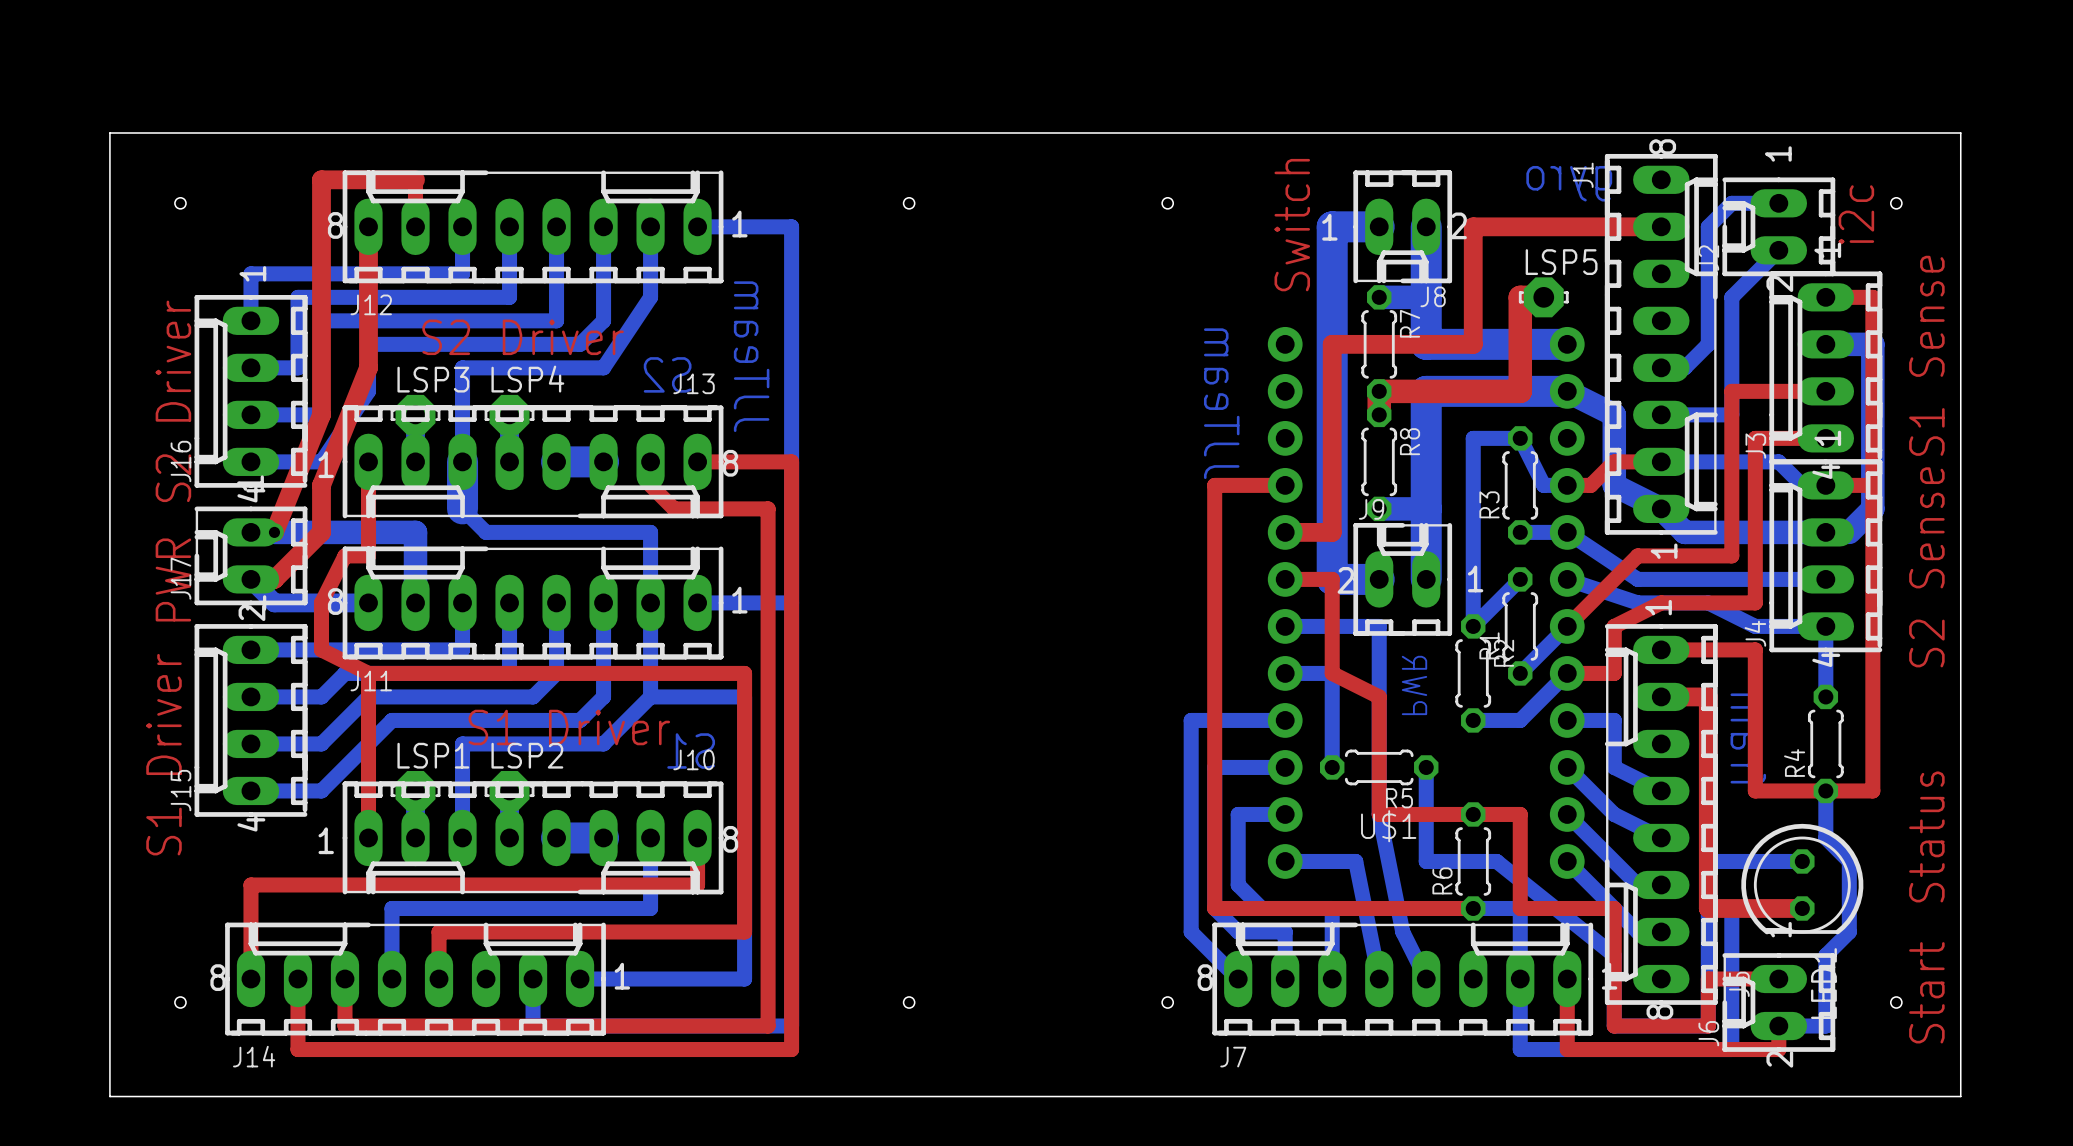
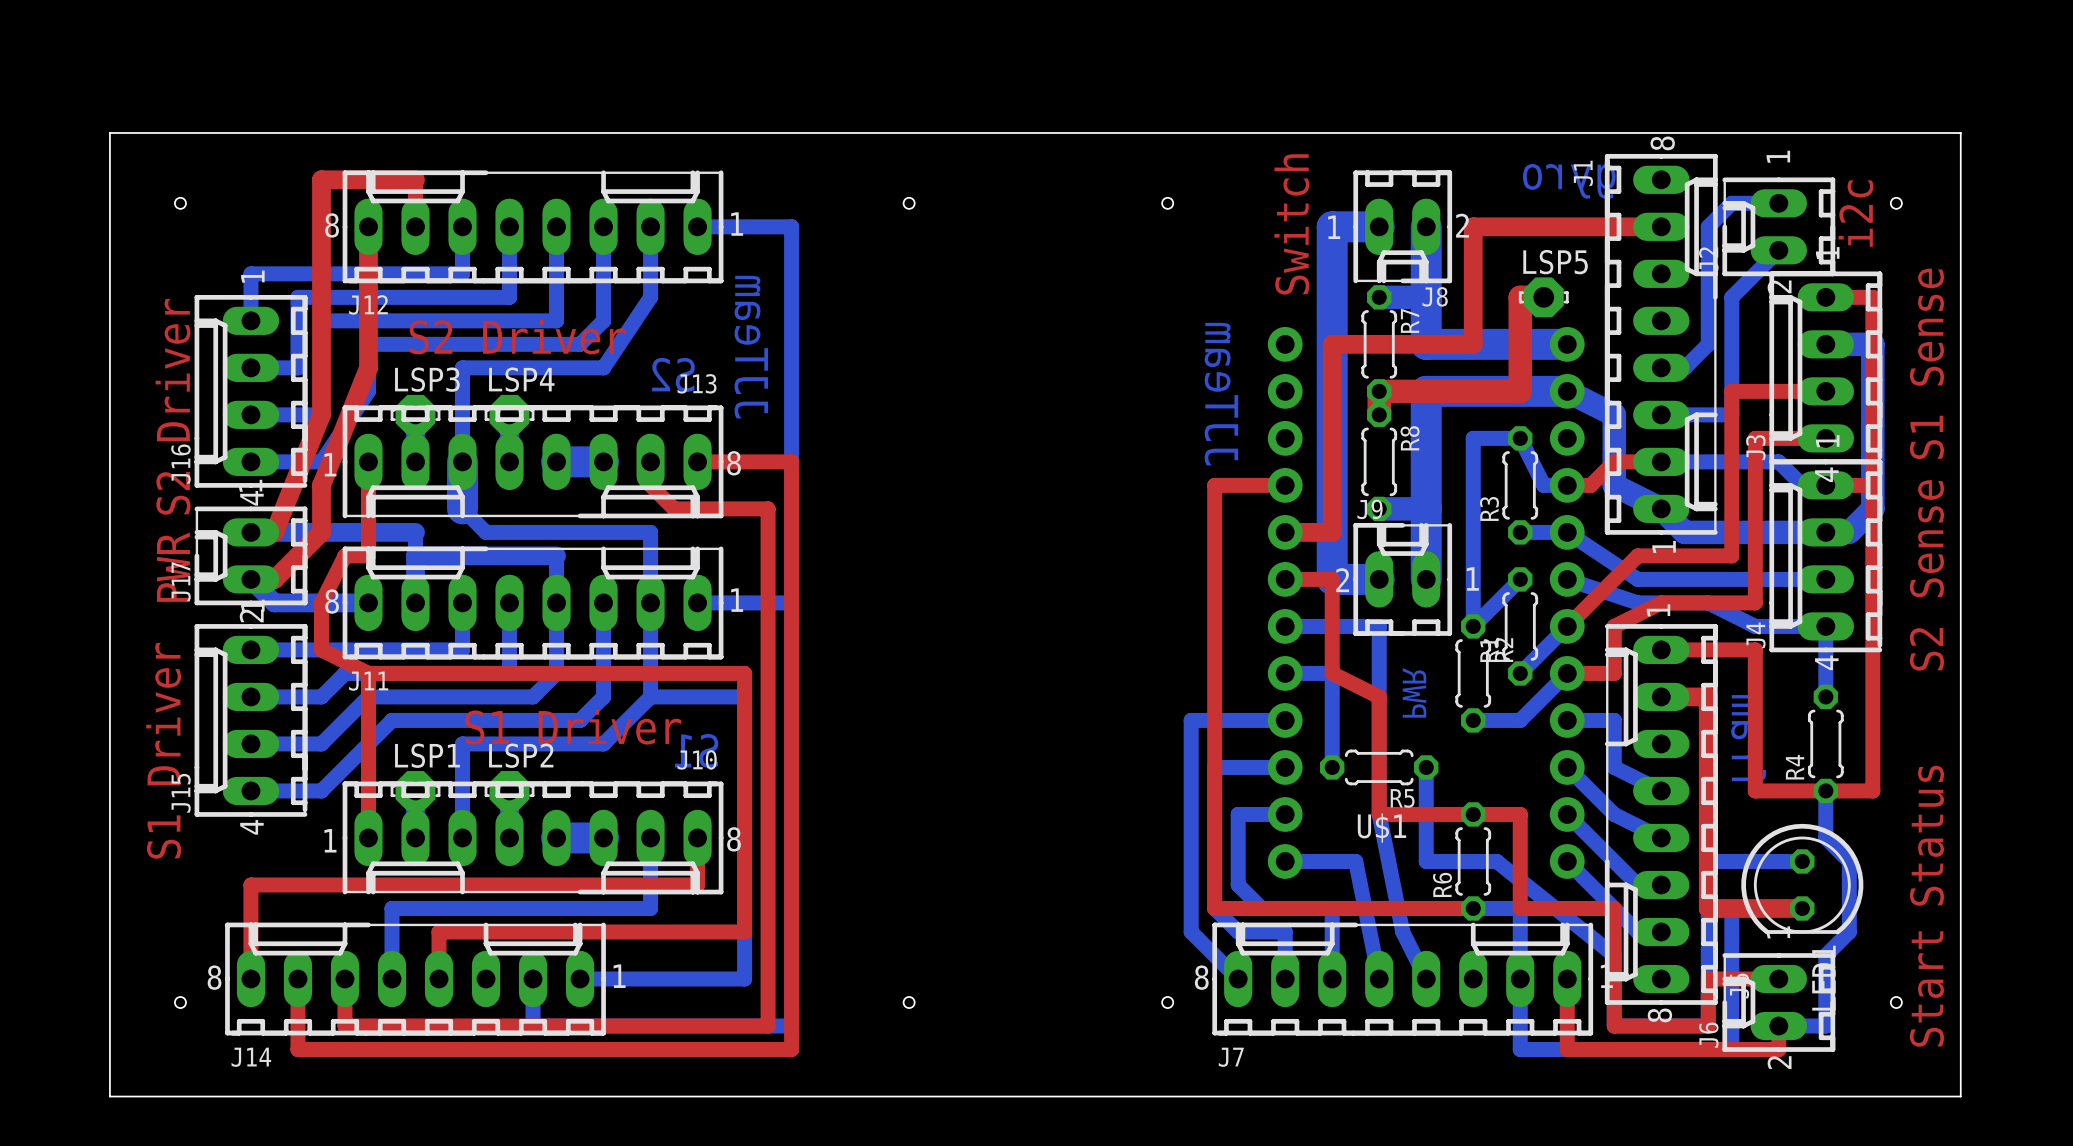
bottom track width: thick (274, 532) (415, 532) (415, 602) -> thin (274, 532) (415, 532) (415, 602)
via: (274, 532) -> none
bottom track: none -> (415, 555) (556, 555) (556, 602)

